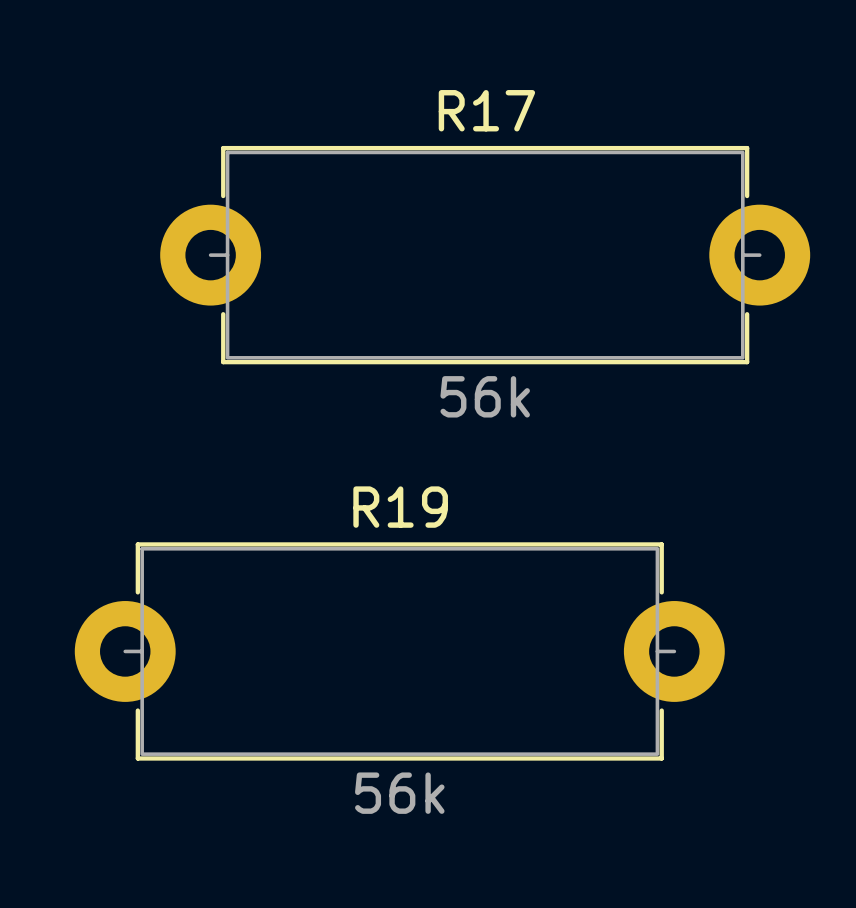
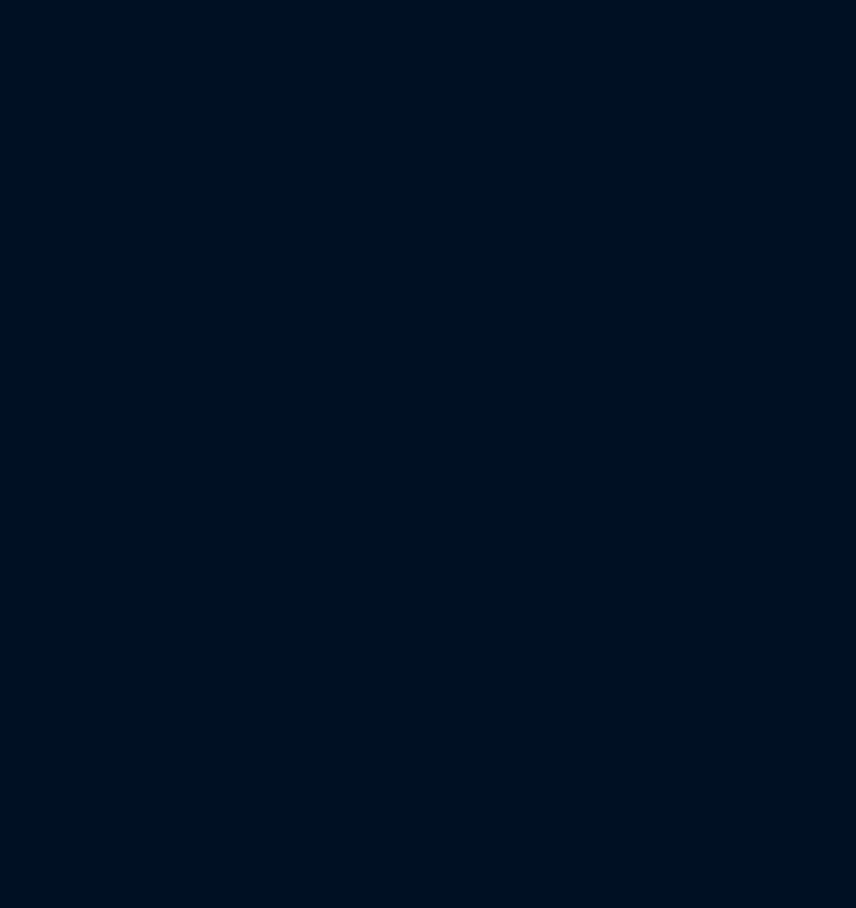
R17: 56k (485, 255) -> none
R19: 56k (399, 651) -> none

